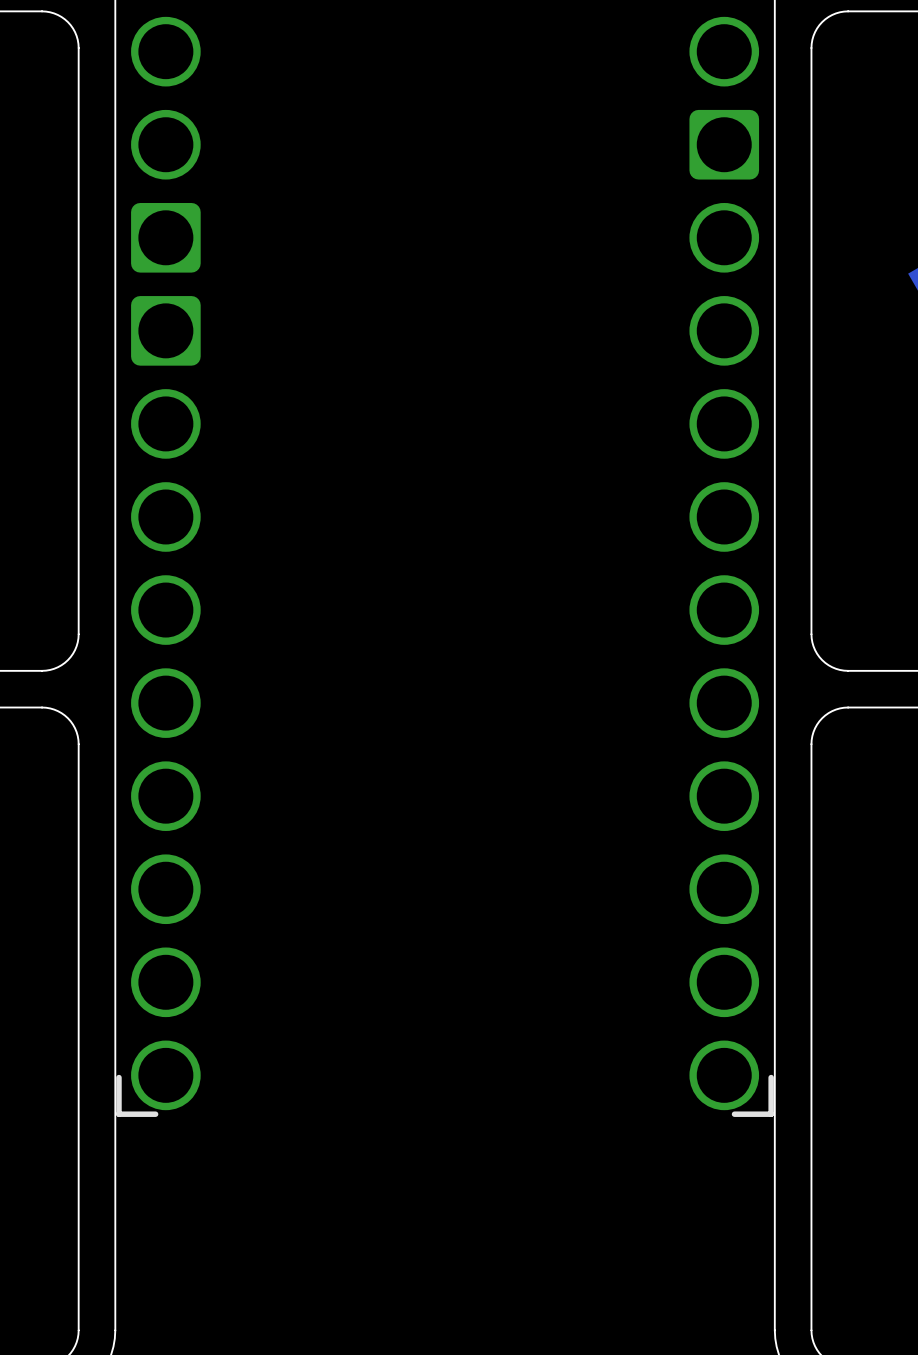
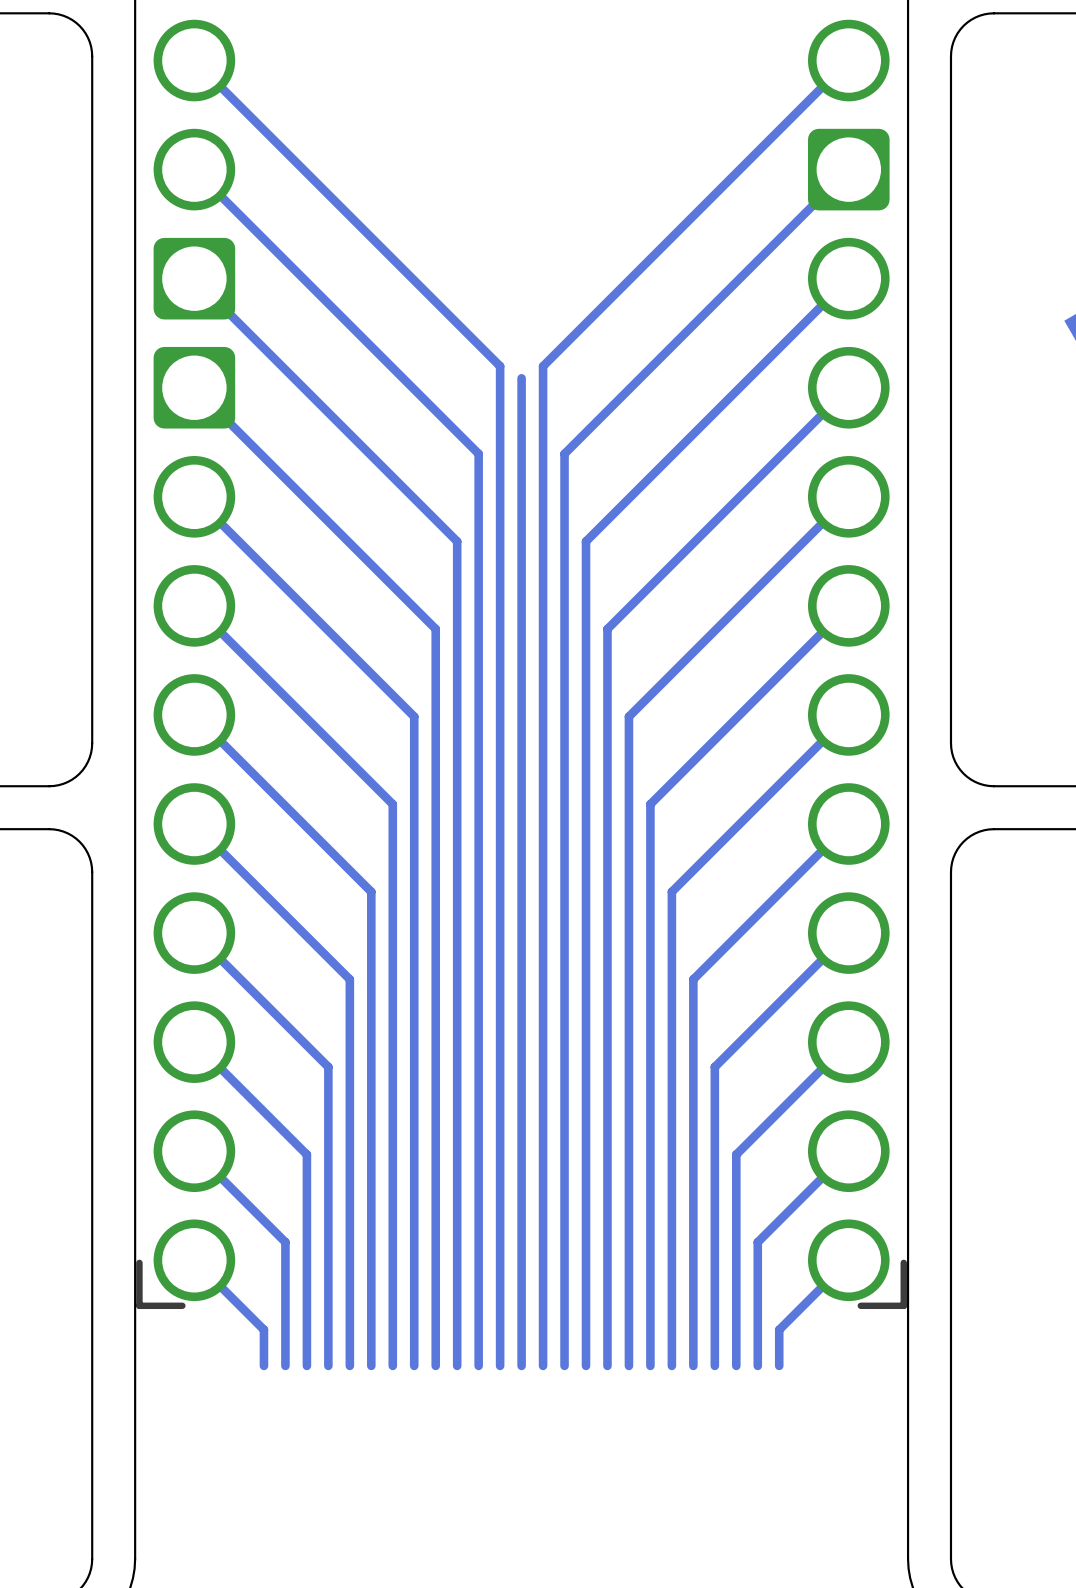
bottom track: none -> (194, 60) (500, 366) (500, 1365)
bottom track: none -> (848, 60) (543, 366) (543, 1365)
bottom track: none -> (194, 169) (478, 453) (478, 1365)
bottom track: none -> (848, 169) (564, 453) (564, 1365)
bottom track: none -> (194, 278) (457, 541) (457, 1365)
bottom track: none -> (848, 278) (586, 541) (586, 1365)
bottom track: none -> (521, 378) (521, 1365)
bottom track: none -> (194, 387) (435, 629) (435, 1365)
bottom track: none -> (848, 387) (607, 629) (607, 1365)
bottom track: none -> (194, 496) (414, 716) (414, 1365)
bottom track: none -> (848, 496) (628, 716) (628, 1365)
bottom track: none -> (194, 605) (392, 804) (392, 1365)
bottom track: none -> (848, 605) (650, 804) (650, 1365)
bottom track: none -> (194, 714) (371, 891) (371, 1365)
bottom track: none -> (848, 714) (671, 891) (671, 1365)
bottom track: none -> (194, 824) (349, 979) (349, 1365)
bottom track: none -> (848, 824) (693, 979) (693, 1365)
bottom track: none -> (194, 933) (328, 1067) (328, 1365)
bottom track: none -> (848, 933) (714, 1067) (714, 1365)
bottom track: none -> (194, 1042) (306, 1154) (306, 1365)
bottom track: none -> (848, 1042) (736, 1154) (736, 1365)
bottom track: none -> (194, 1151) (285, 1242) (285, 1365)
bottom track: none -> (848, 1151) (757, 1242) (757, 1365)
bottom track: none -> (194, 1260) (263, 1329) (263, 1365)
bottom track: none -> (848, 1260) (779, 1329) (779, 1365)

